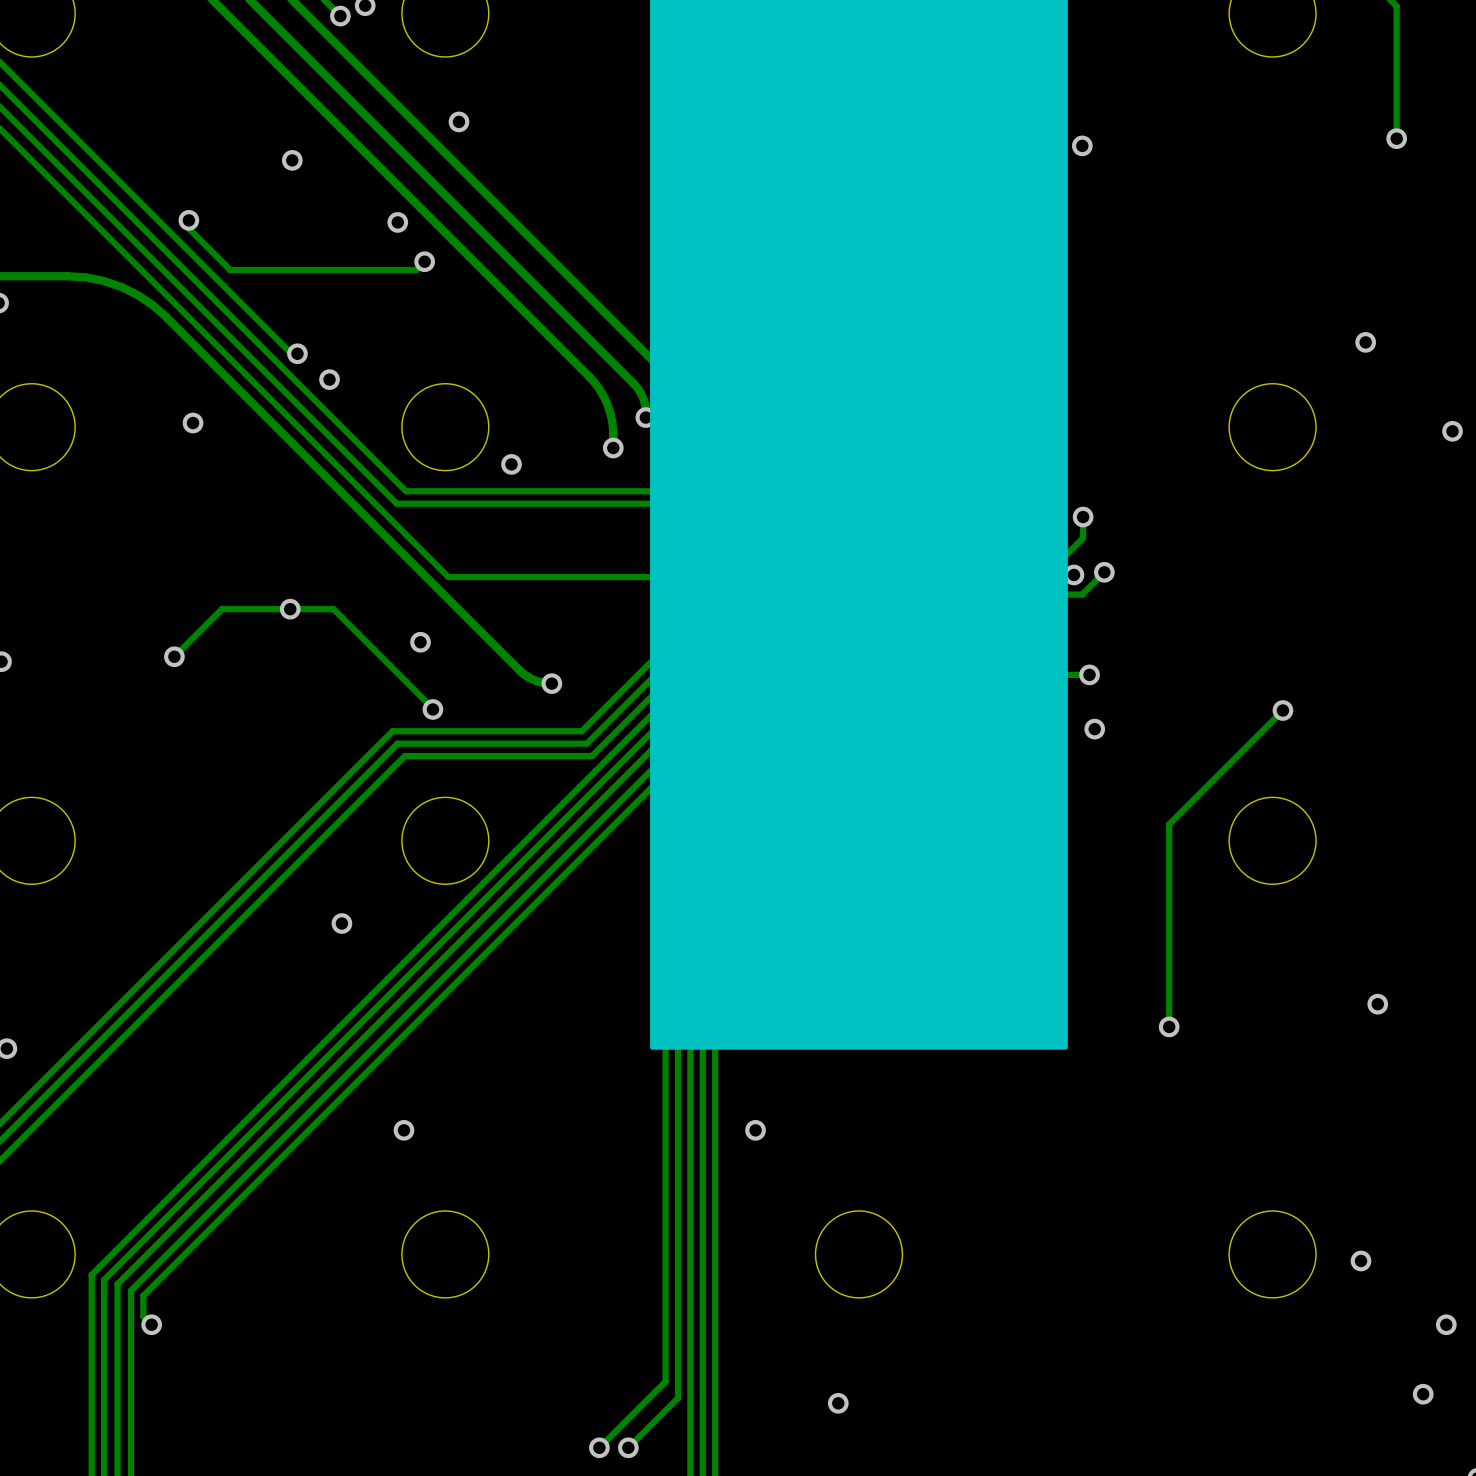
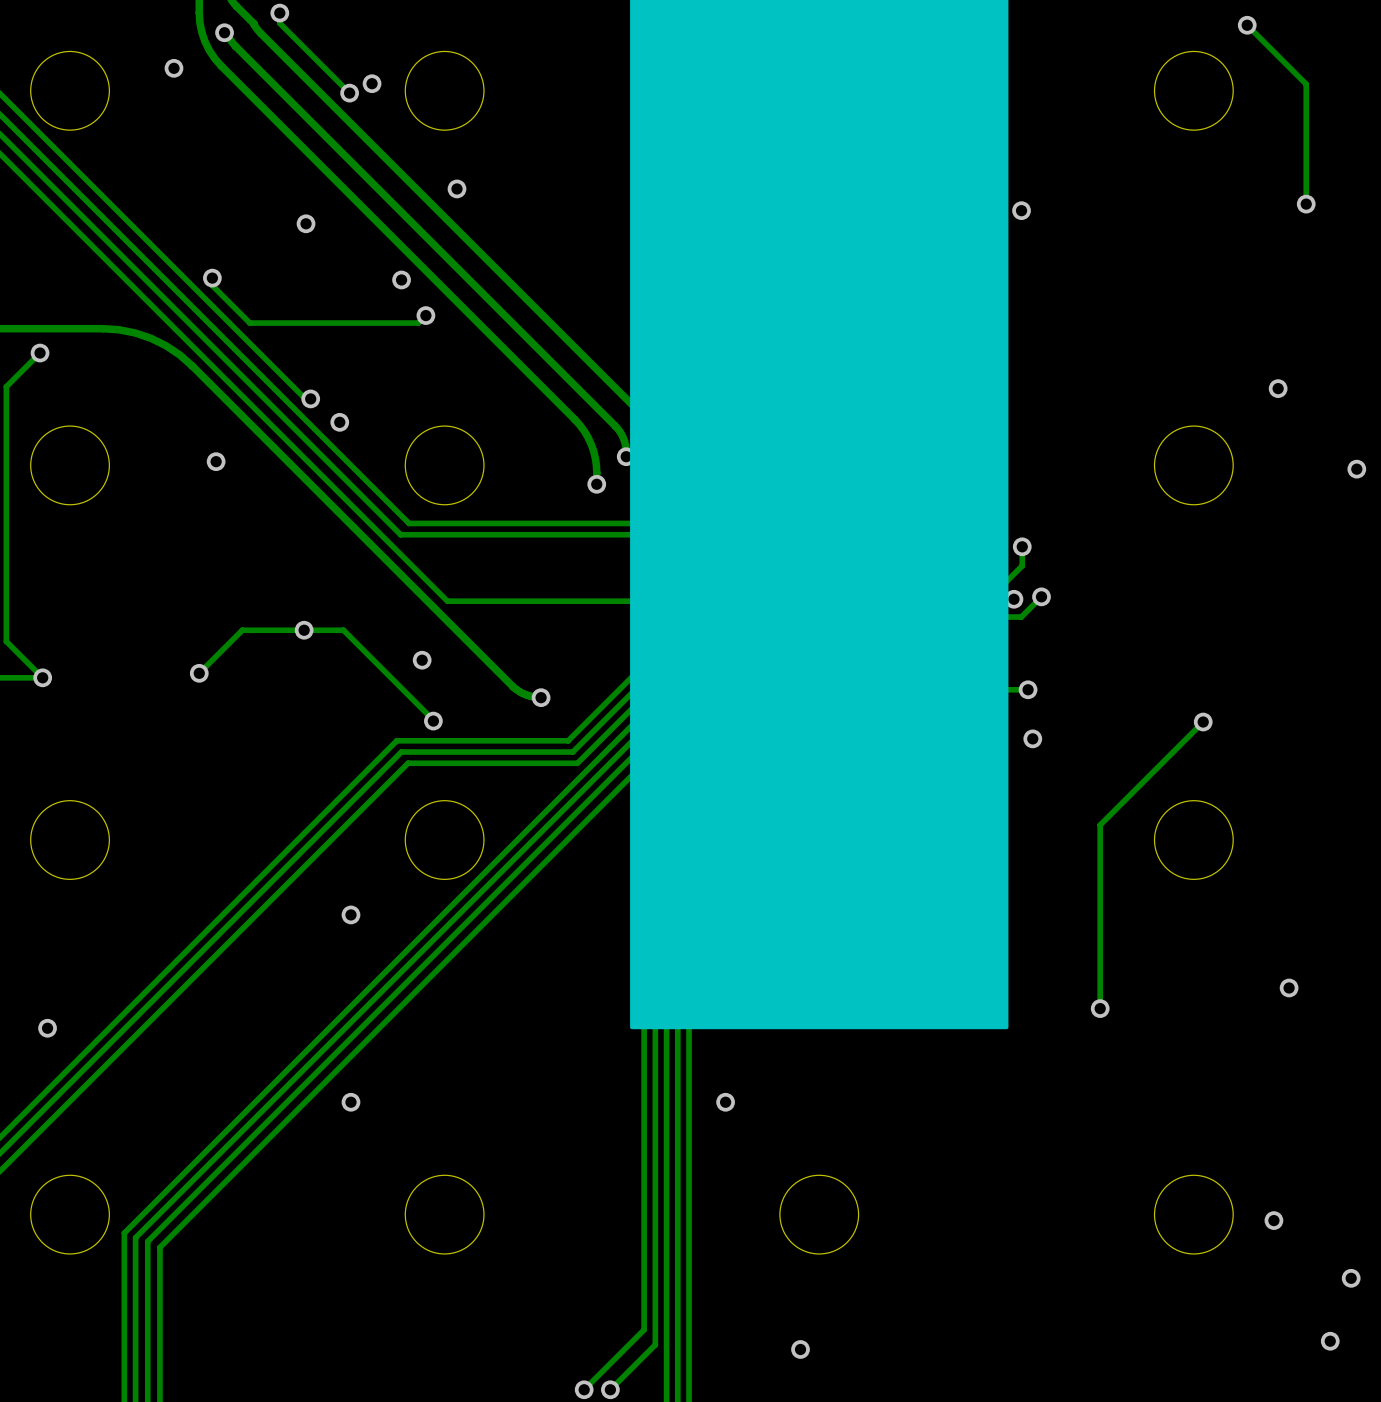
via: (511, 464) -> none
track: (788, 679) (759, 679) (143, 1295) (143, 1316) (151, 1324) -> none
via position: (403, 1130) -> (350, 1102)
via: (151, 1324) -> none

